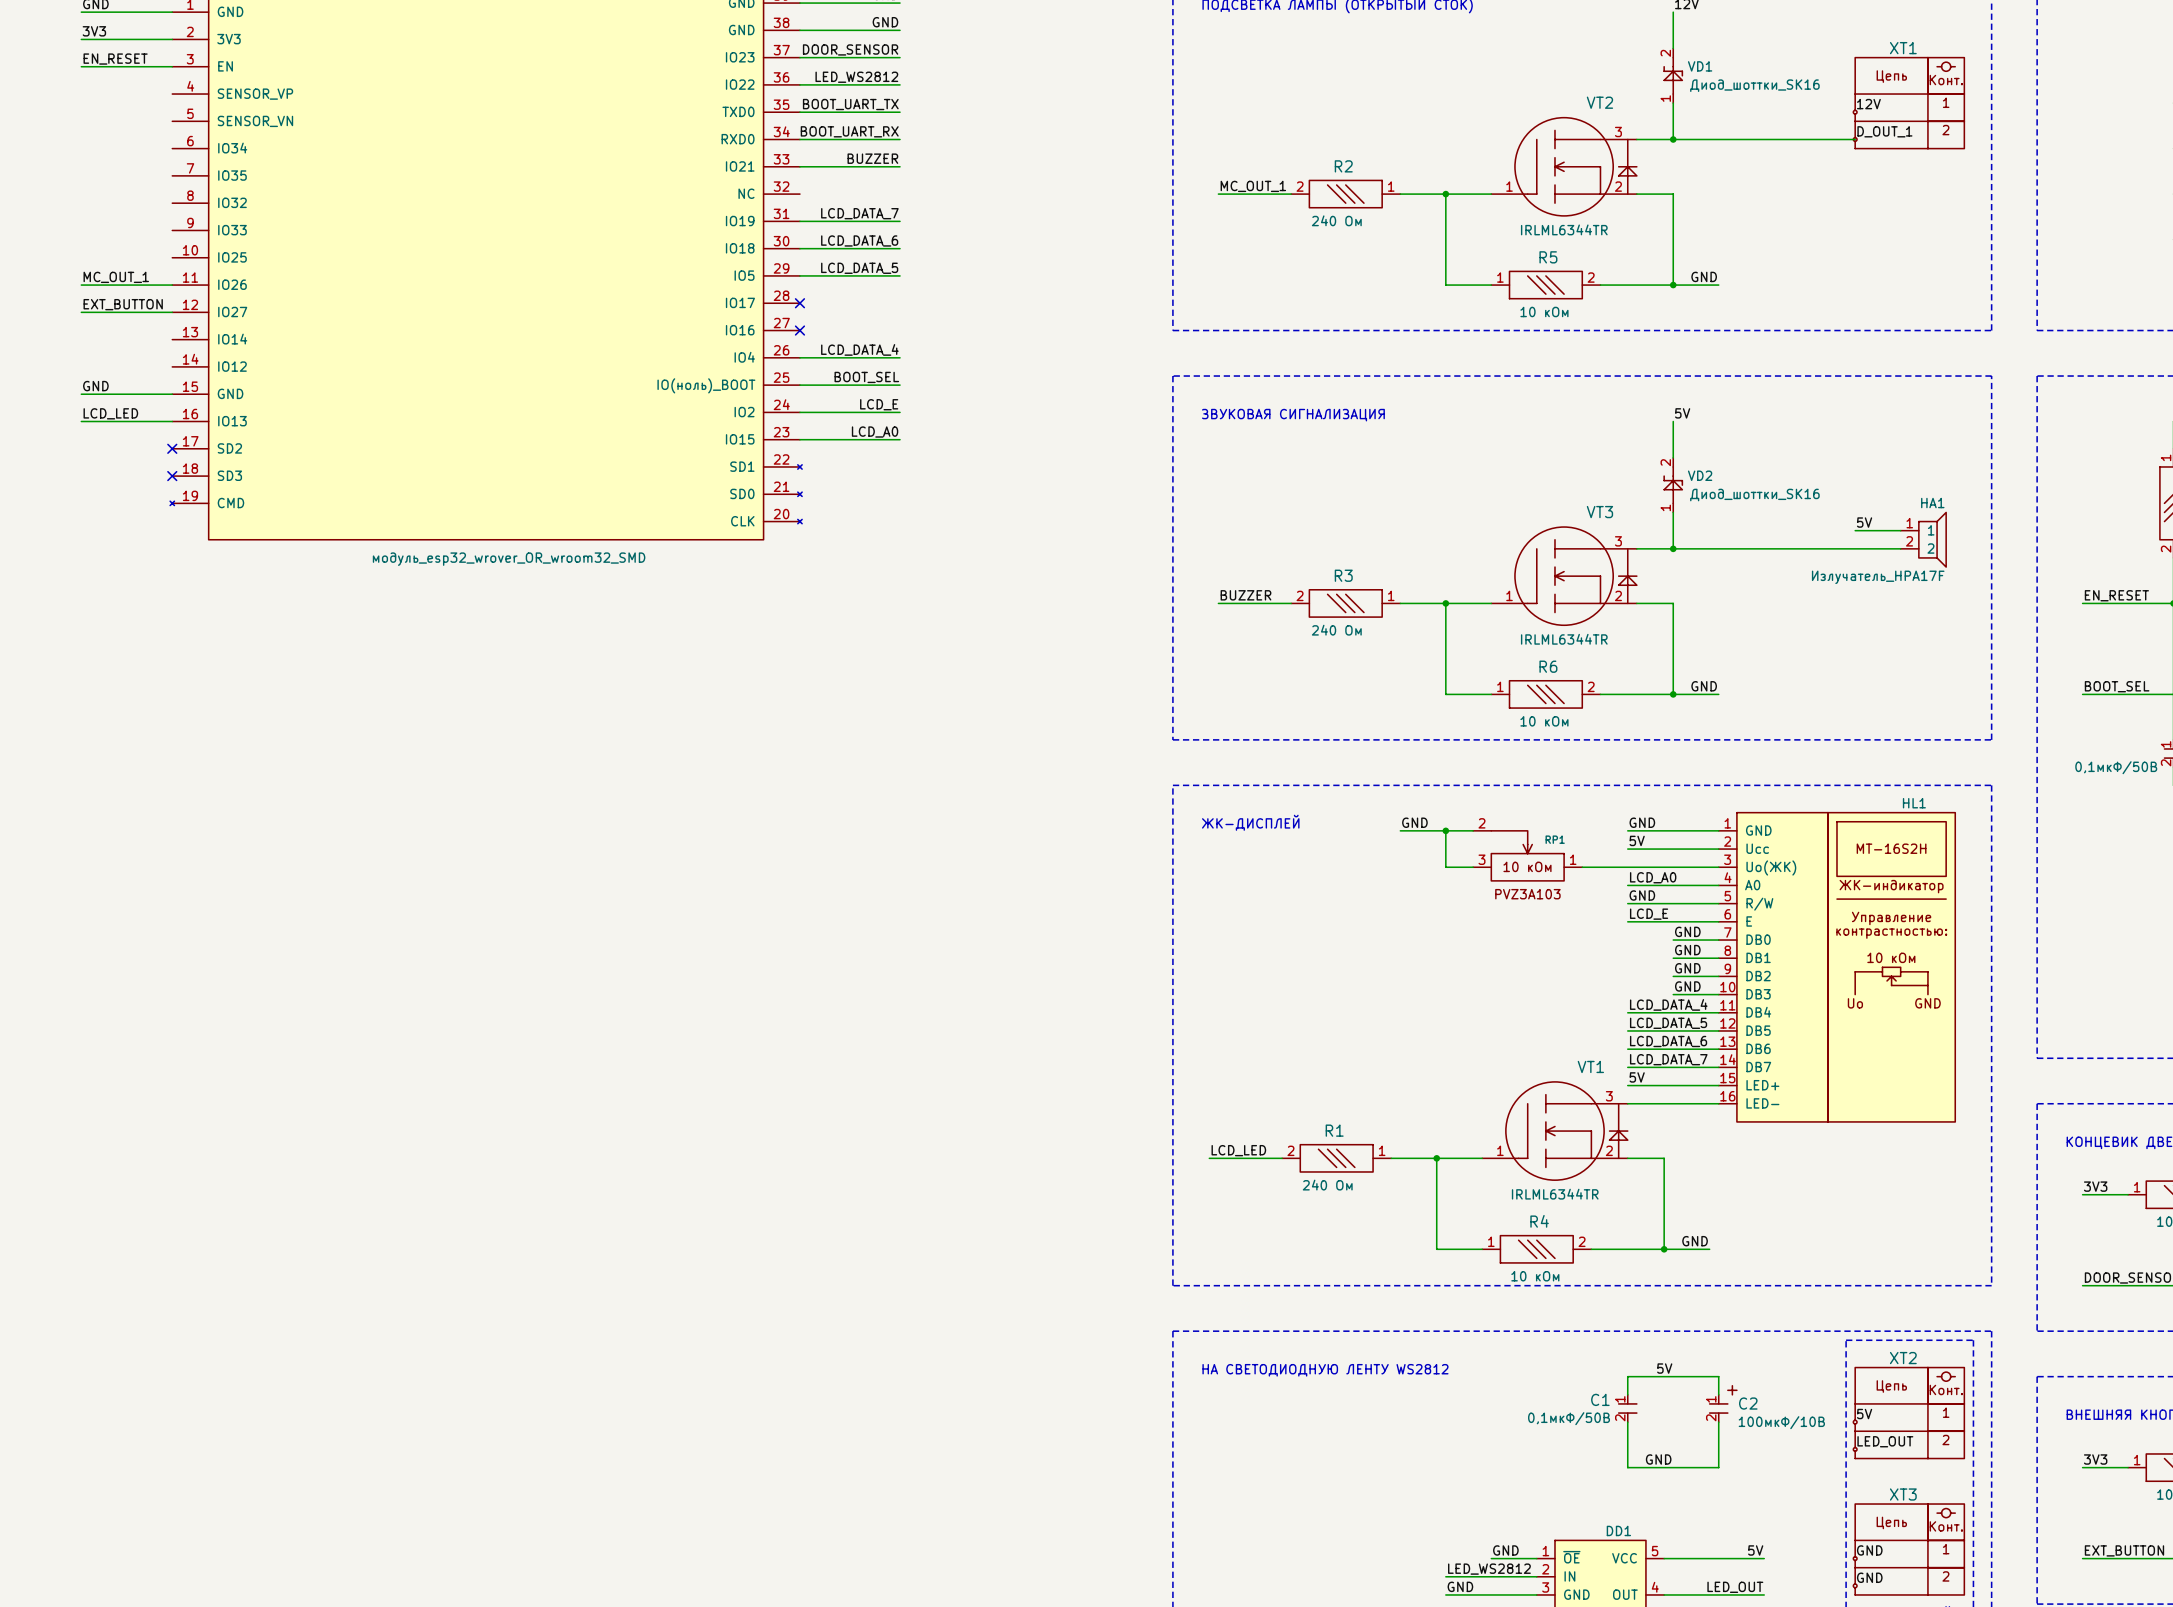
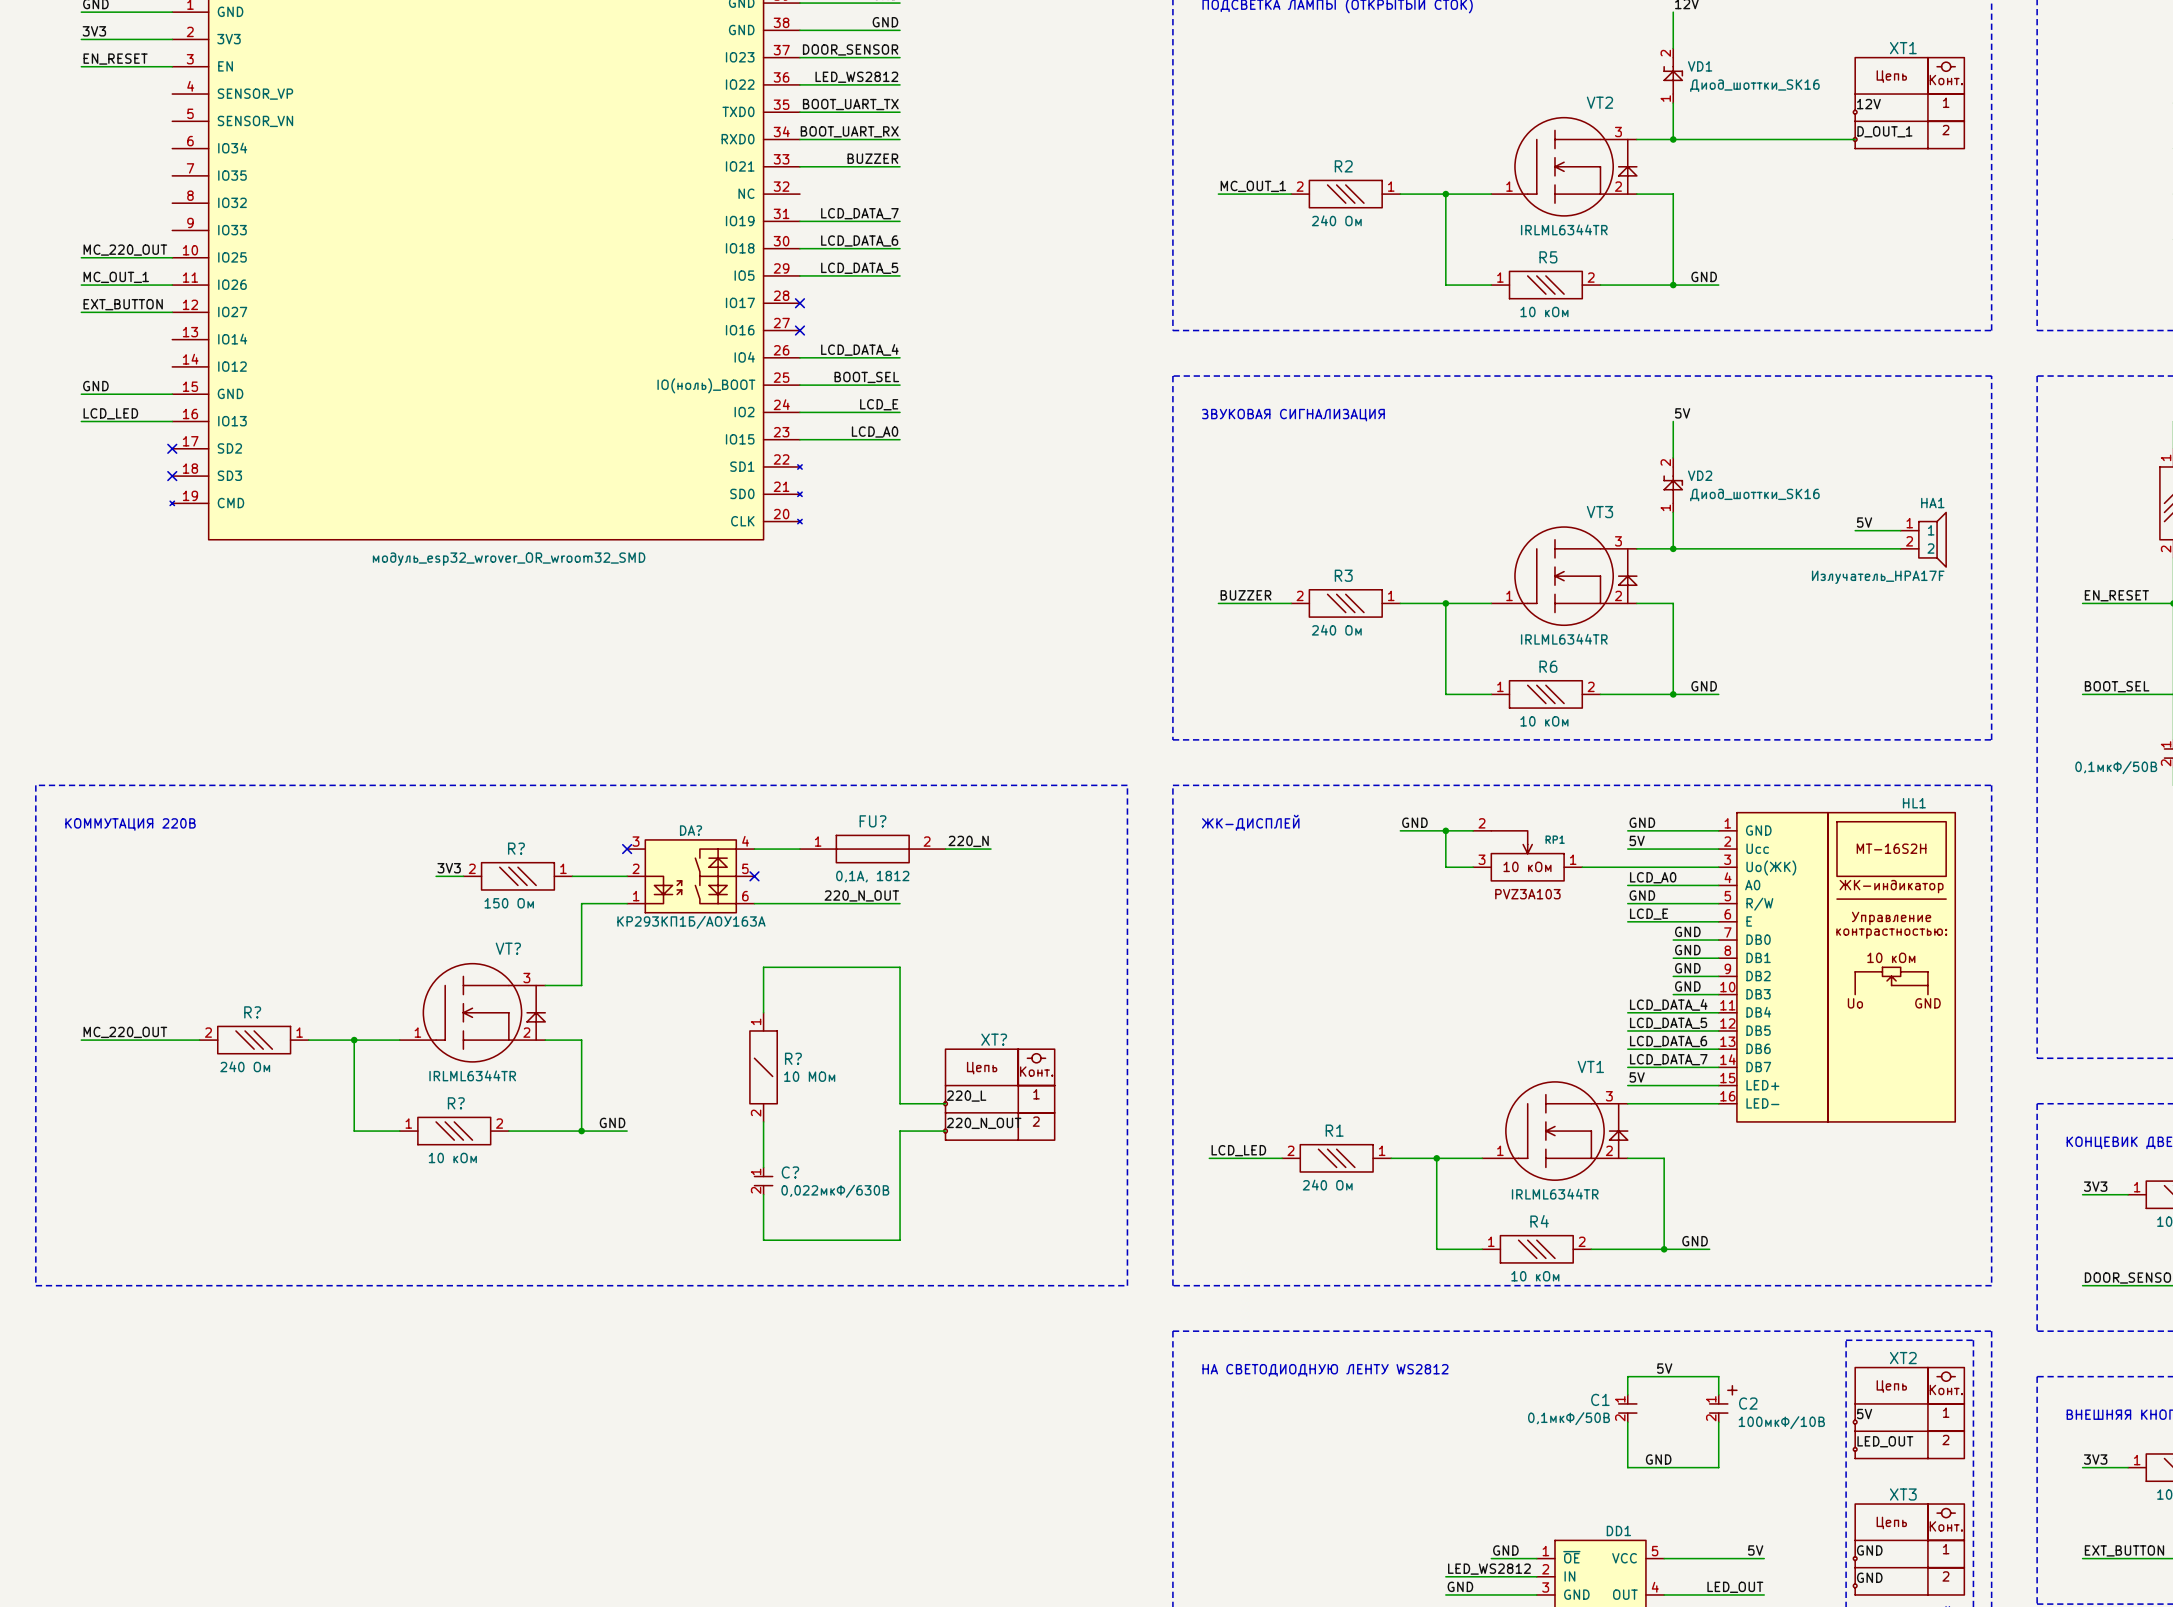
label: none -> MC_220_OUT (125, 250)
wire: none -> (81, 257) (172, 257)
line: none -> (35, 785) (1127, 785) (1127, 1285) (35, 1285) (35, 785)
text: none -> КОММУТАЦИЯ 220В (130, 824)
label: none -> 220_N (968, 841)
no-connect mark: none -> (627, 849)
wire: none -> (754, 849) (799, 849)
FU?: none -> (872, 849)
wire: none -> (945, 849) (990, 849)
label: none -> 3V3 (449, 868)
wire: none -> (436, 876) (463, 876)
R?: none -> (517, 876)
wire: none -> (572, 876) (627, 876)
DA?: none -> (690, 876)
no-connect mark: none -> (754, 876)
label: none -> 220_N_OUT (861, 895)
wire: none -> (627, 903) (581, 903) (581, 985) (545, 985)
wire: none -> (754, 903) (900, 903)
VT?: none -> (472, 1012)
wire: none -> (763, 1012) (763, 967) (900, 967) (900, 1103) (945, 1103)
label: none -> MC_220_OUT (125, 1032)
wire: none -> (81, 1040) (199, 1040)
R?: none -> (254, 1040)
wire: none -> (308, 1040) (399, 1040)
wire: none -> (354, 1040) (354, 1131) (399, 1131)
junction: none -> (354, 1040)
wire: none -> (545, 1040) (581, 1040) (581, 1131)
R?: none -> (763, 1067)
XT?: none -> (999, 1094)
label: none -> 220_L (966, 1096)
wire: none -> (763, 1121) (763, 1167)
label: none -> GND (612, 1122)
label: none -> 220_N_OUT (984, 1123)
R?: none -> (454, 1131)
wire: none -> (508, 1131) (627, 1131)
junction: none -> (581, 1131)
wire: none -> (945, 1131) (900, 1131) (900, 1240) (763, 1240) (763, 1194)
C?: none -> (763, 1181)

